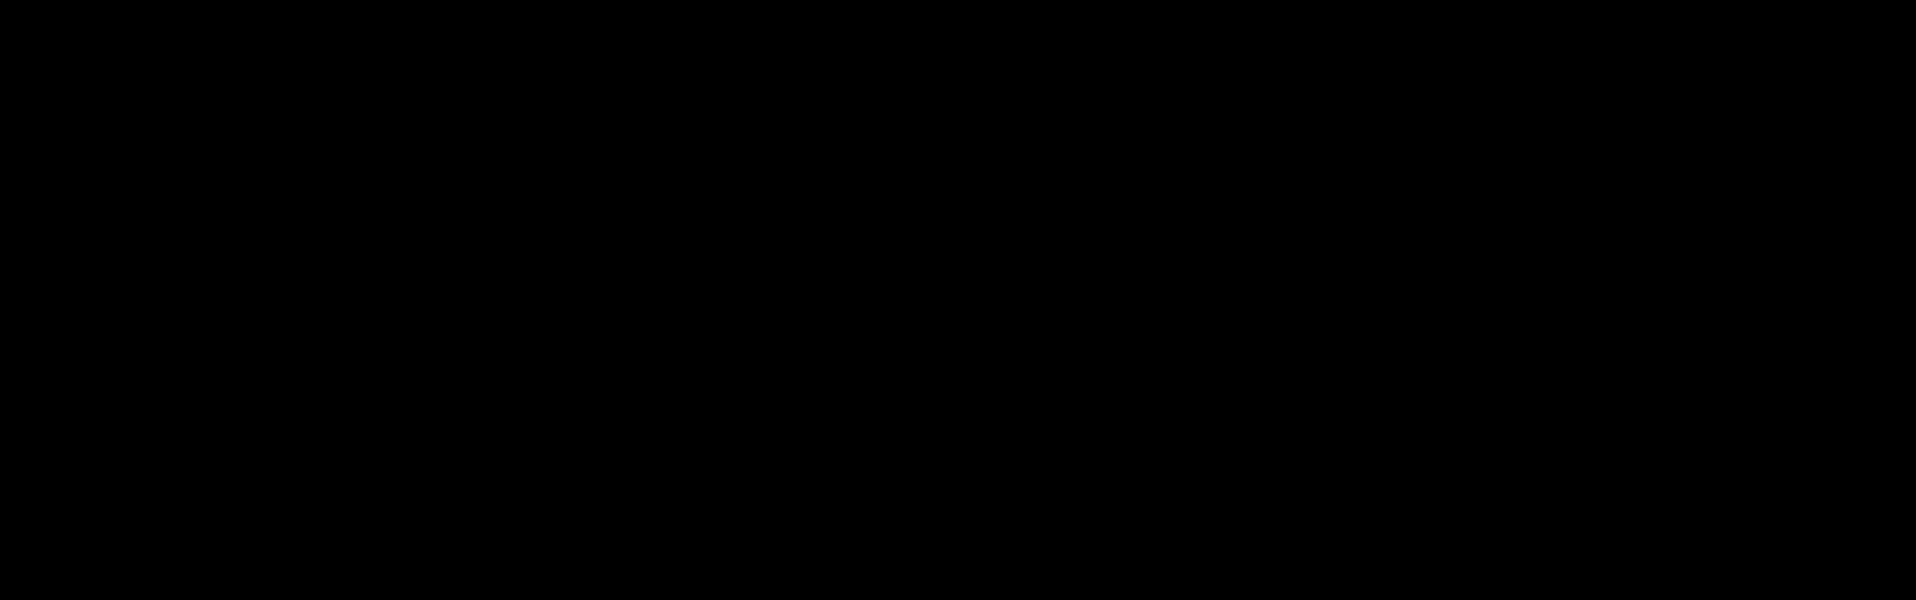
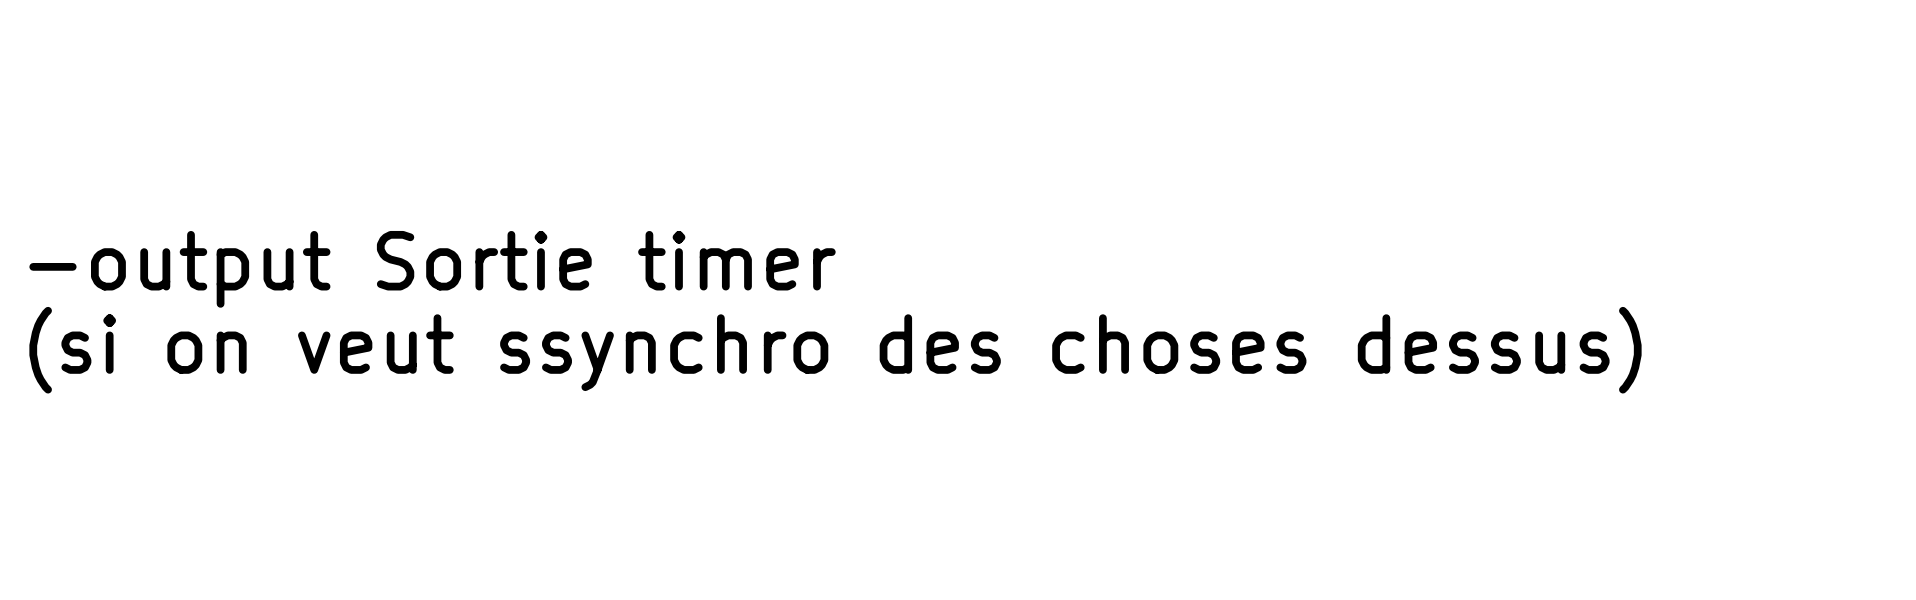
text: none -> -output Sortie timer (432, 269)
text: none -> (si on veut ssynchro des choses dessus) (835, 350)

